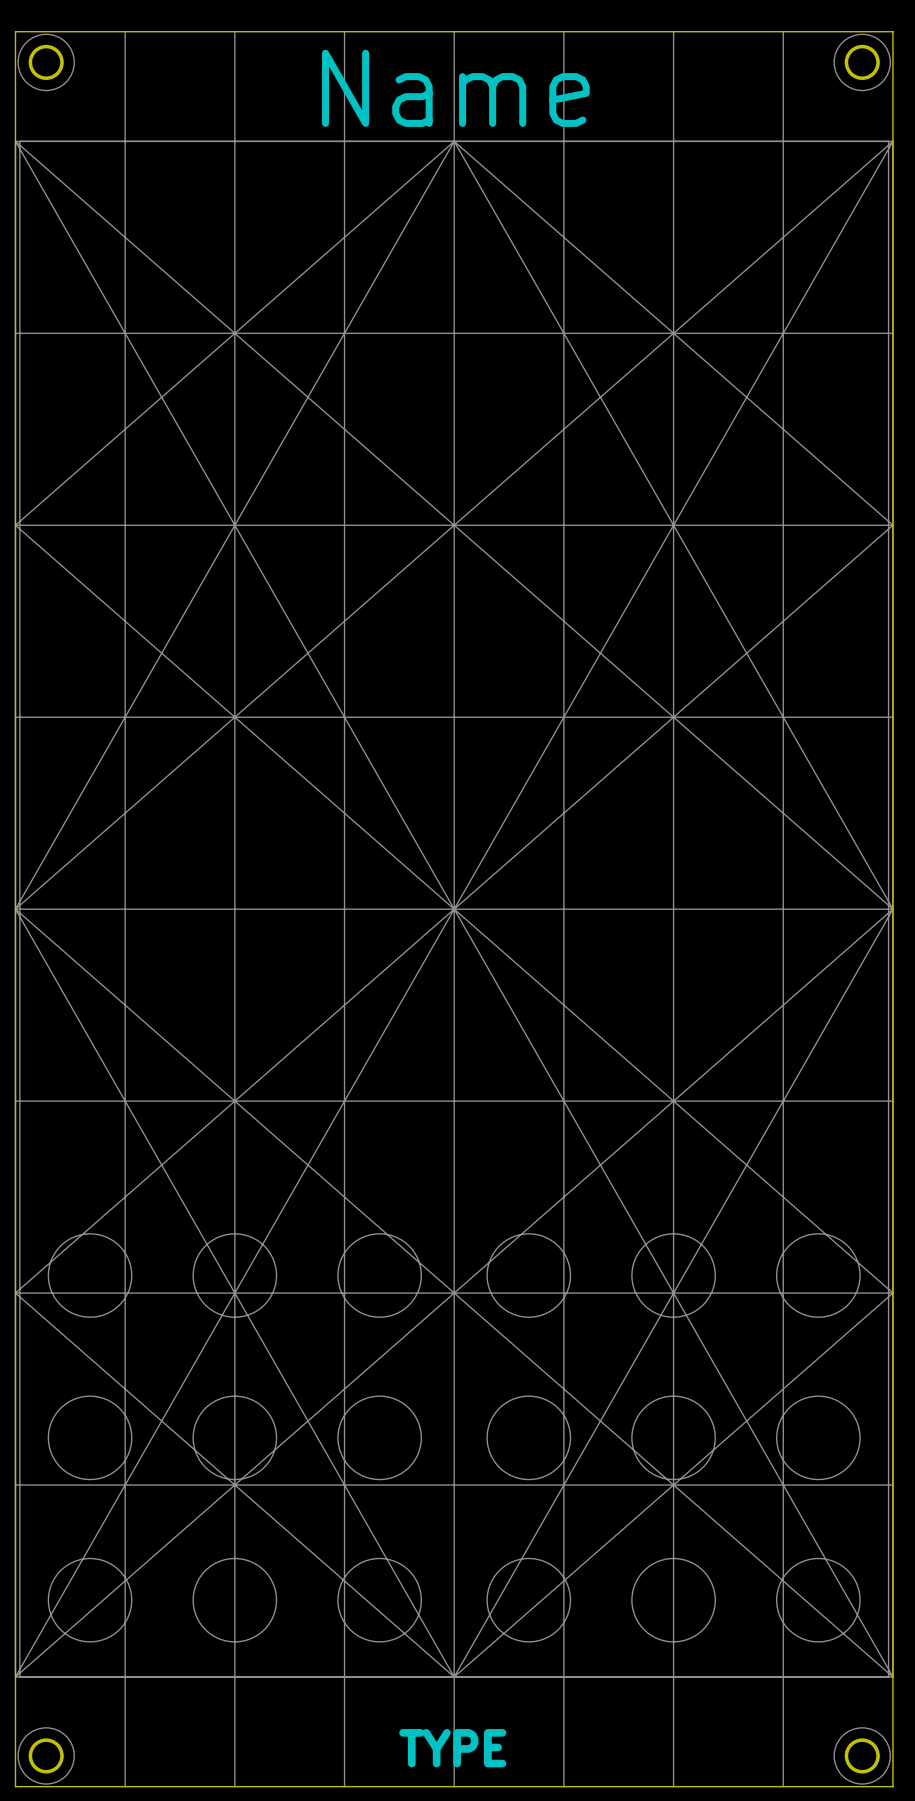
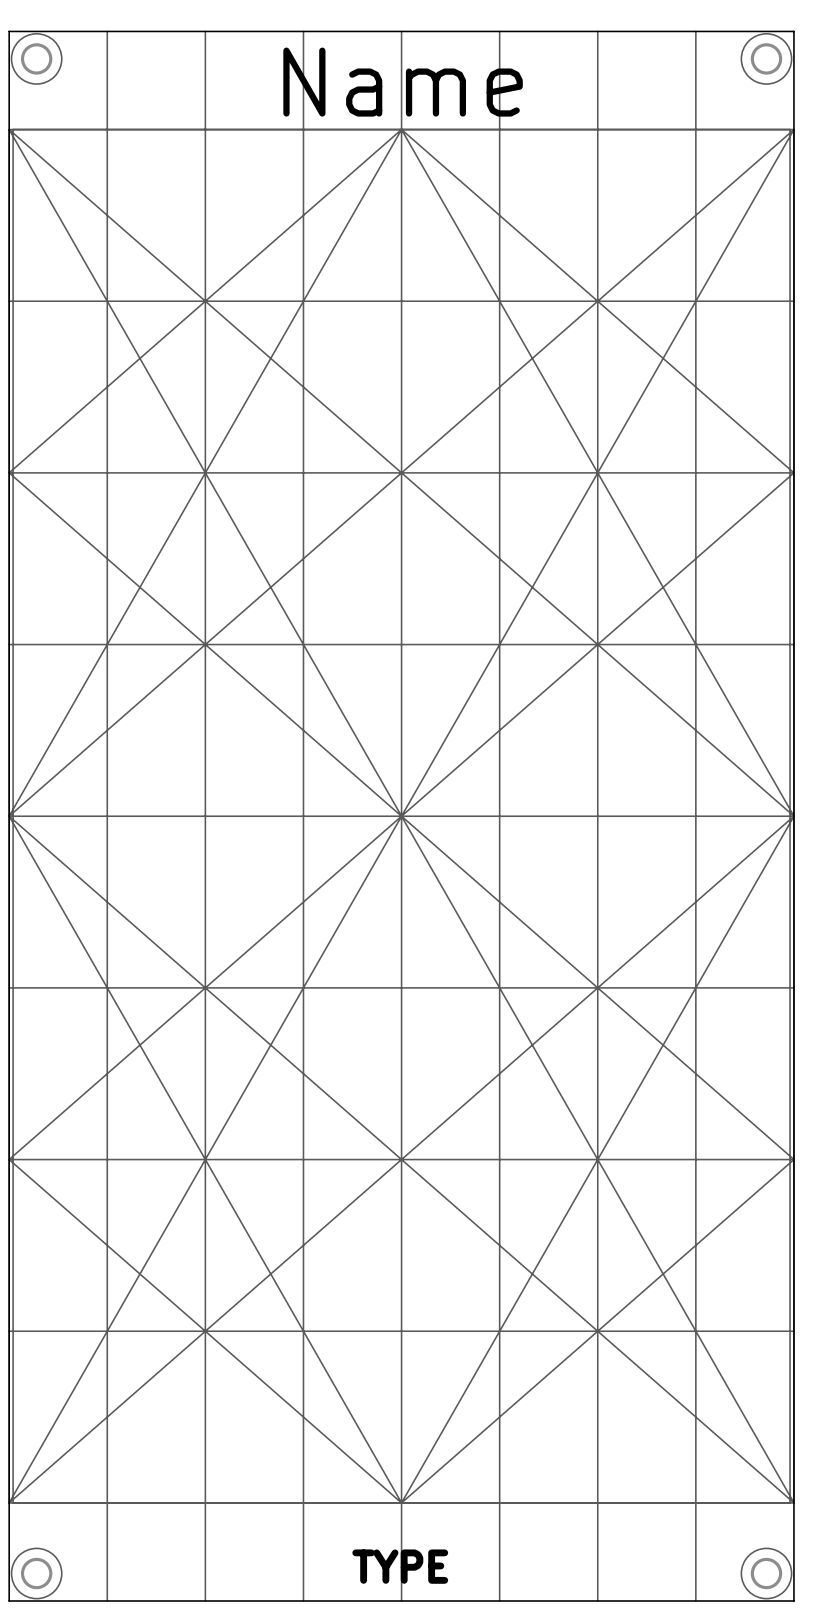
drawing: [47, 1233, 133, 1318] -> none
drawing: [192, 1233, 277, 1318] -> none
drawing: [337, 1233, 422, 1318] -> none
drawing: [486, 1233, 571, 1318] -> none
drawing: [631, 1233, 716, 1318] -> none
drawing: [776, 1233, 861, 1318] -> none
drawing: [47, 1395, 133, 1480] -> none
drawing: [192, 1395, 277, 1480] -> none
drawing: [337, 1395, 422, 1480] -> none
drawing: [486, 1395, 571, 1480] -> none
drawing: [631, 1395, 716, 1480] -> none
drawing: [776, 1395, 861, 1480] -> none
drawing: [47, 1558, 133, 1643] -> none
drawing: [192, 1558, 277, 1643] -> none
drawing: [337, 1558, 422, 1643] -> none
drawing: [486, 1558, 571, 1643] -> none
drawing: [631, 1558, 716, 1643] -> none
drawing: [776, 1558, 861, 1643] -> none

